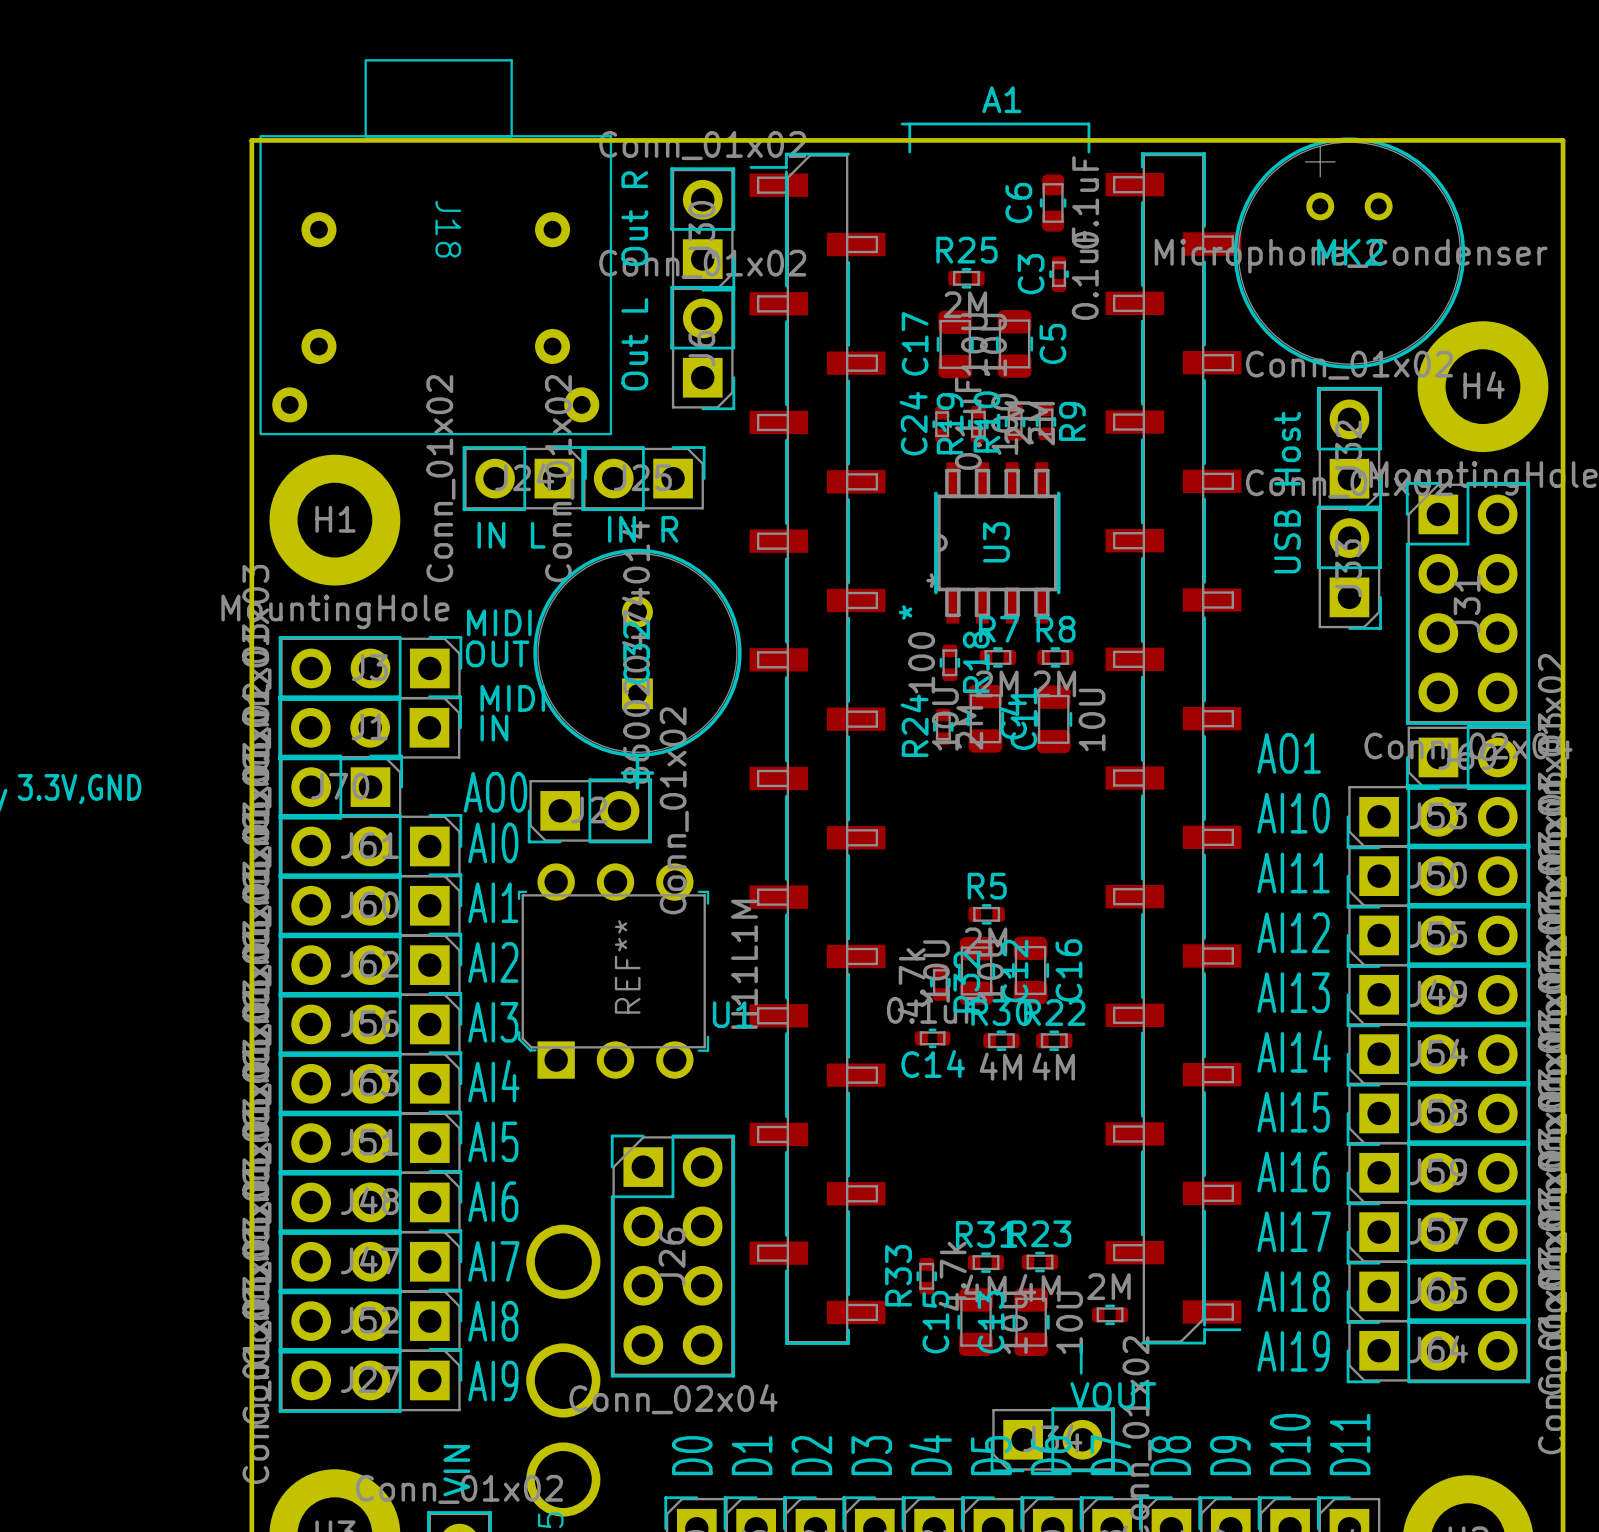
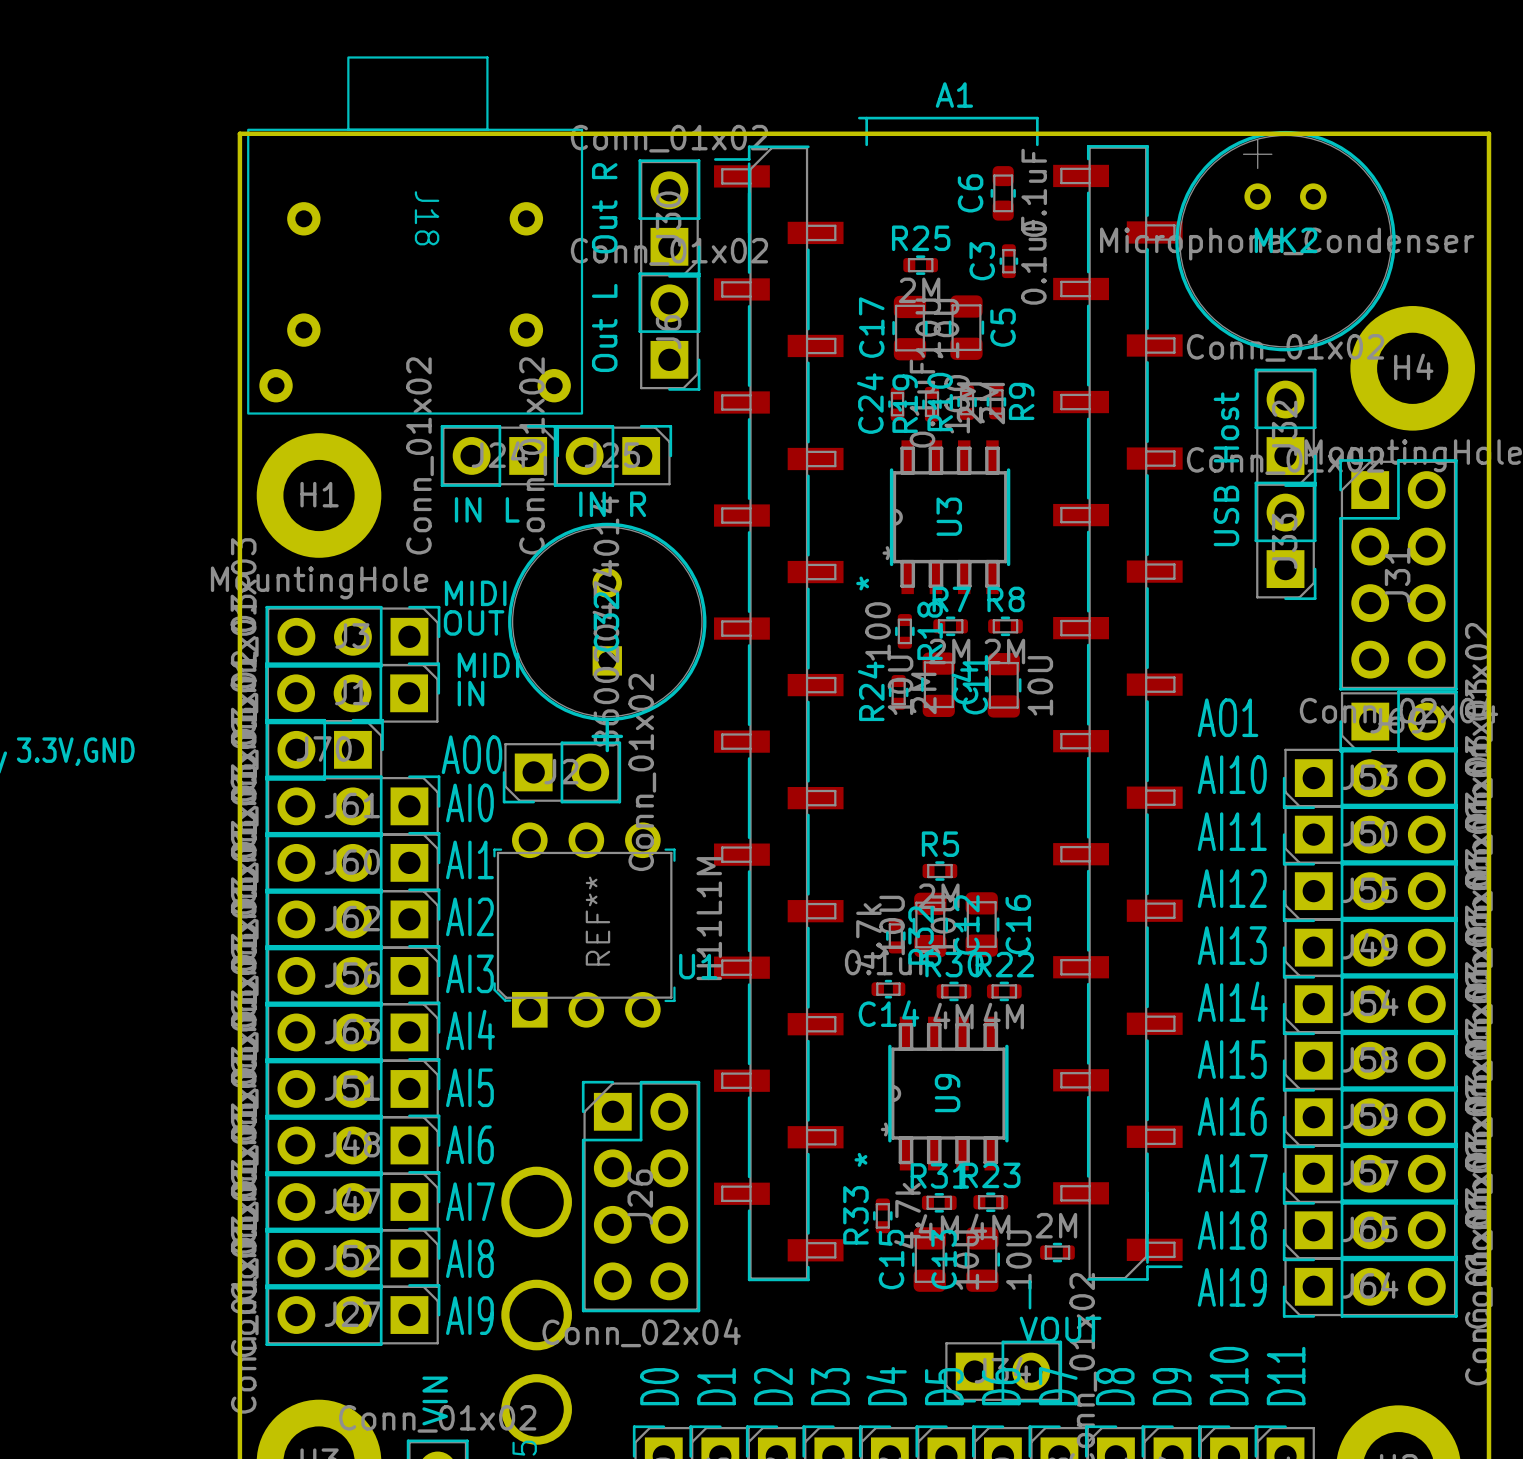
U9: none -> (948, 1093)

